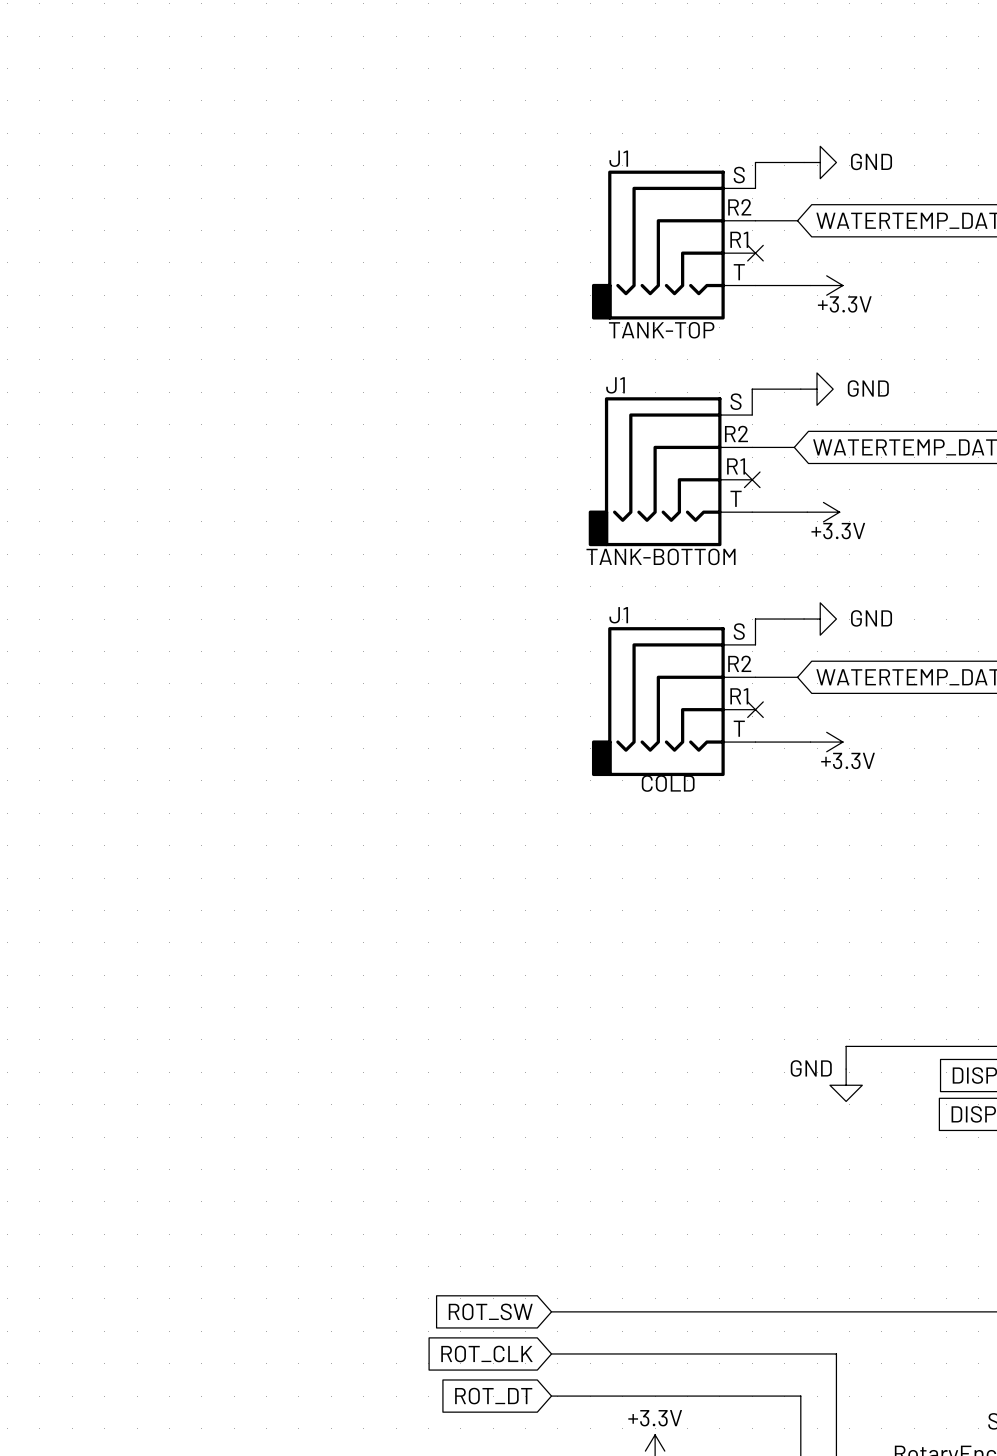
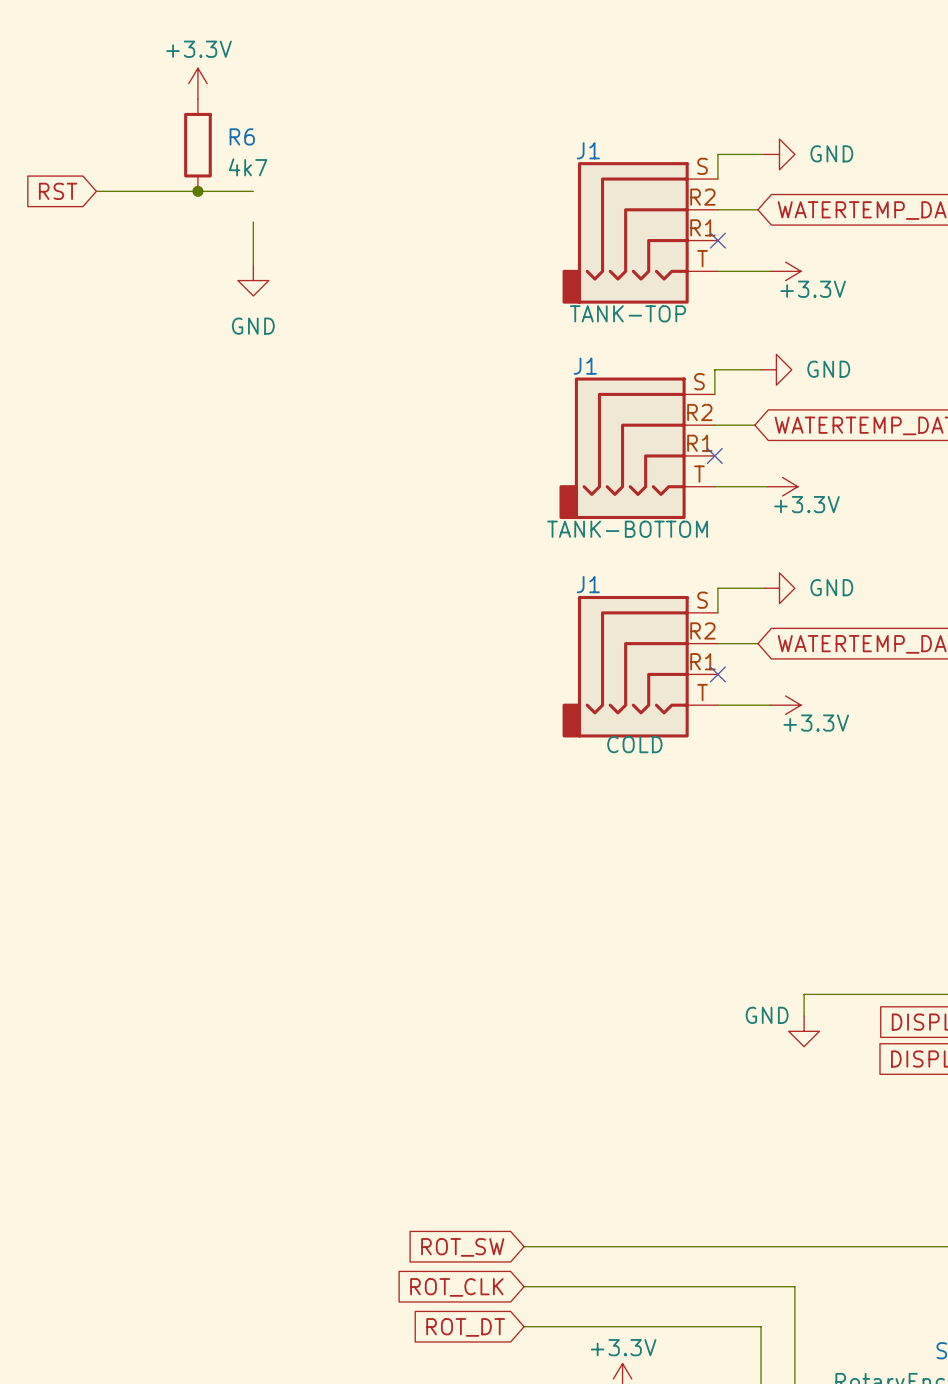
power symbol: none -> +3.3V (197, 83)
R6: none -> 4k7 (197, 145)
global label: none -> RST (58, 191)
wire: none -> (96, 191) (253, 191)
junction: none -> (197, 191)
wire: none -> (253, 222) (253, 265)
power symbol: none -> GND (253, 280)

